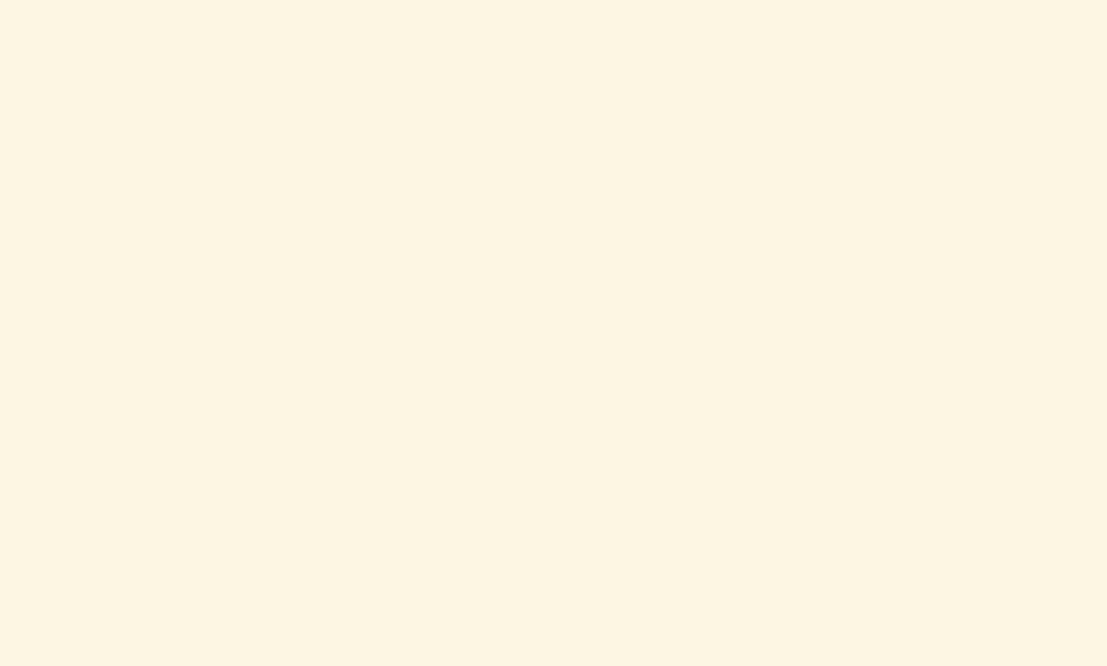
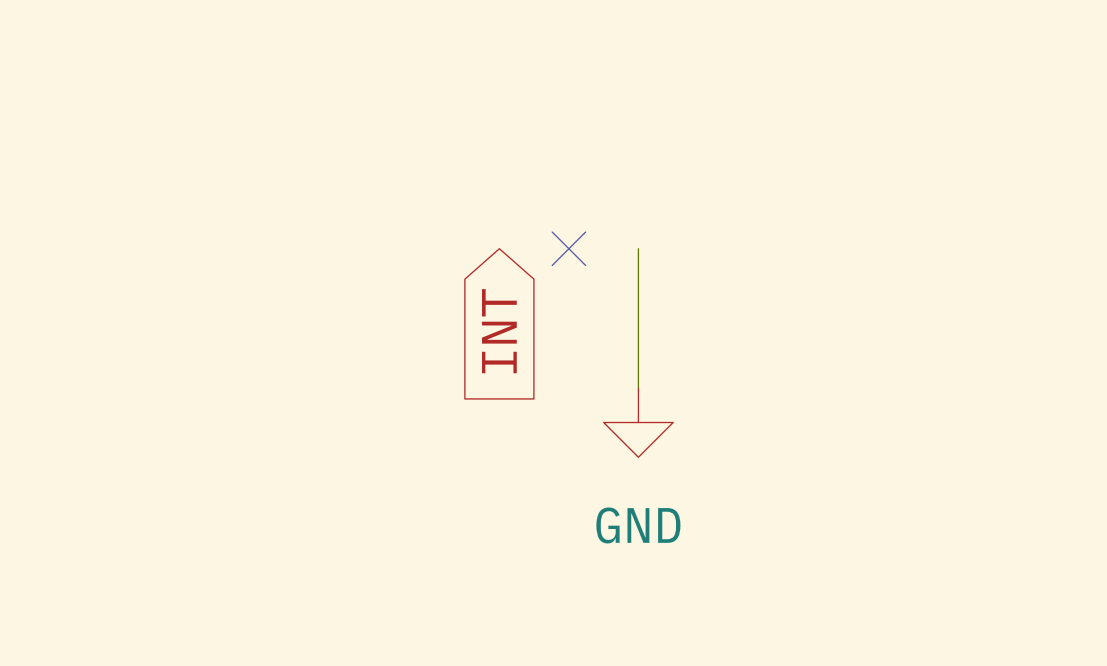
no-connect mark: none -> (568, 248)
wire: none -> (638, 248) (638, 387)
global label: none -> INT (499, 331)
power symbol: none -> GND (638, 422)

